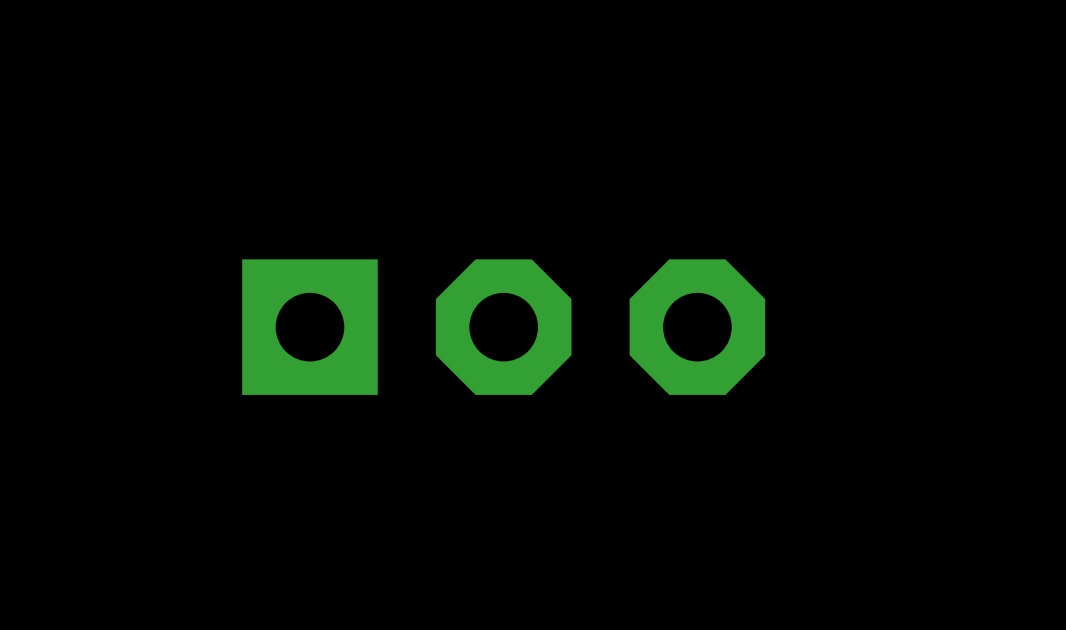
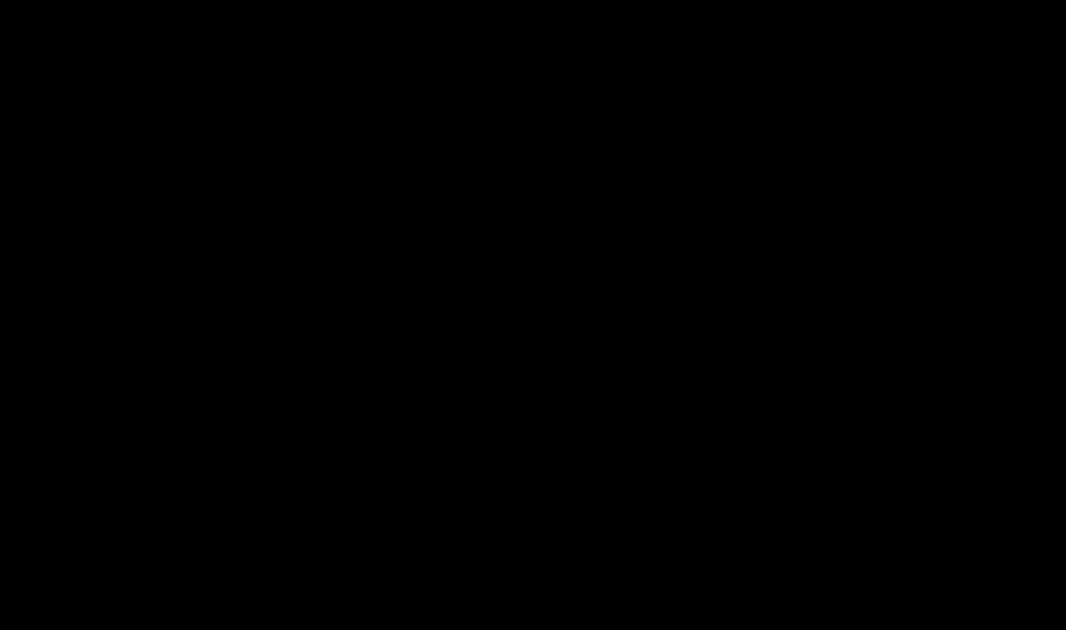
part: (503, 327) -> none

